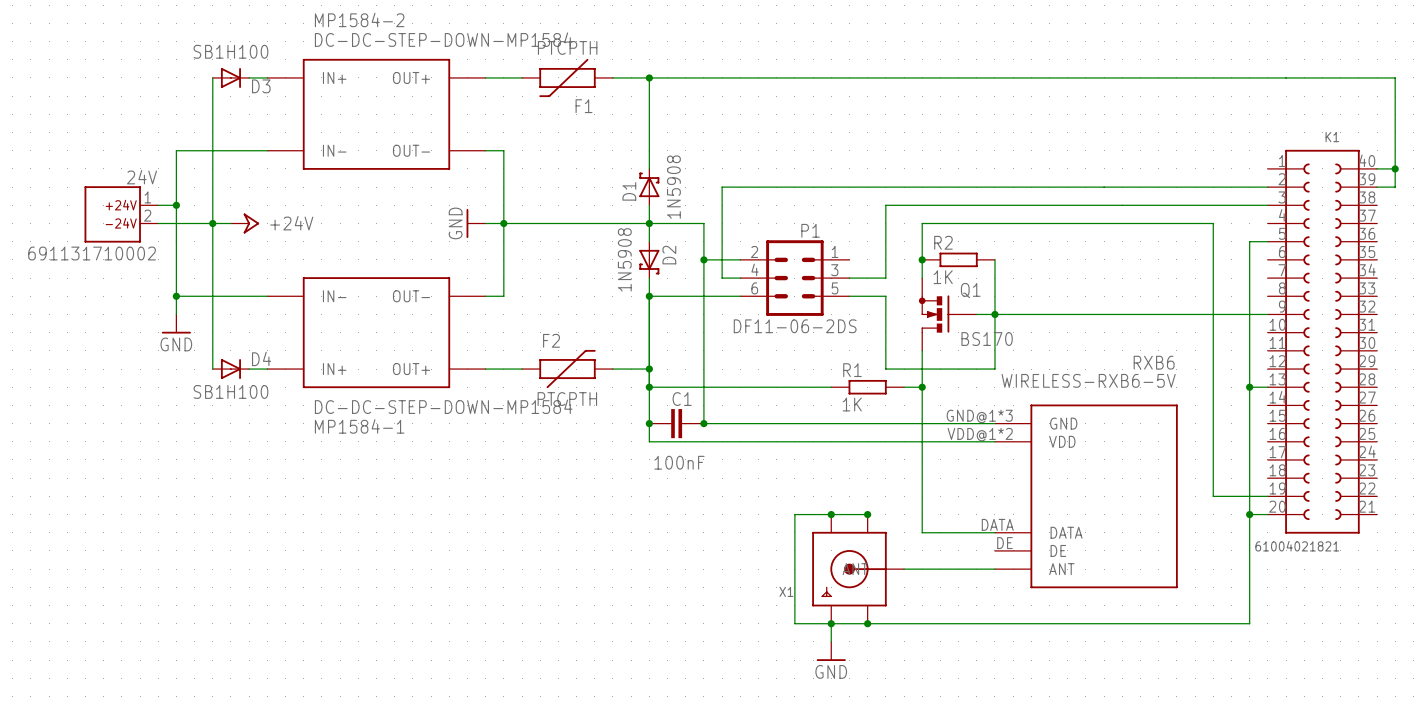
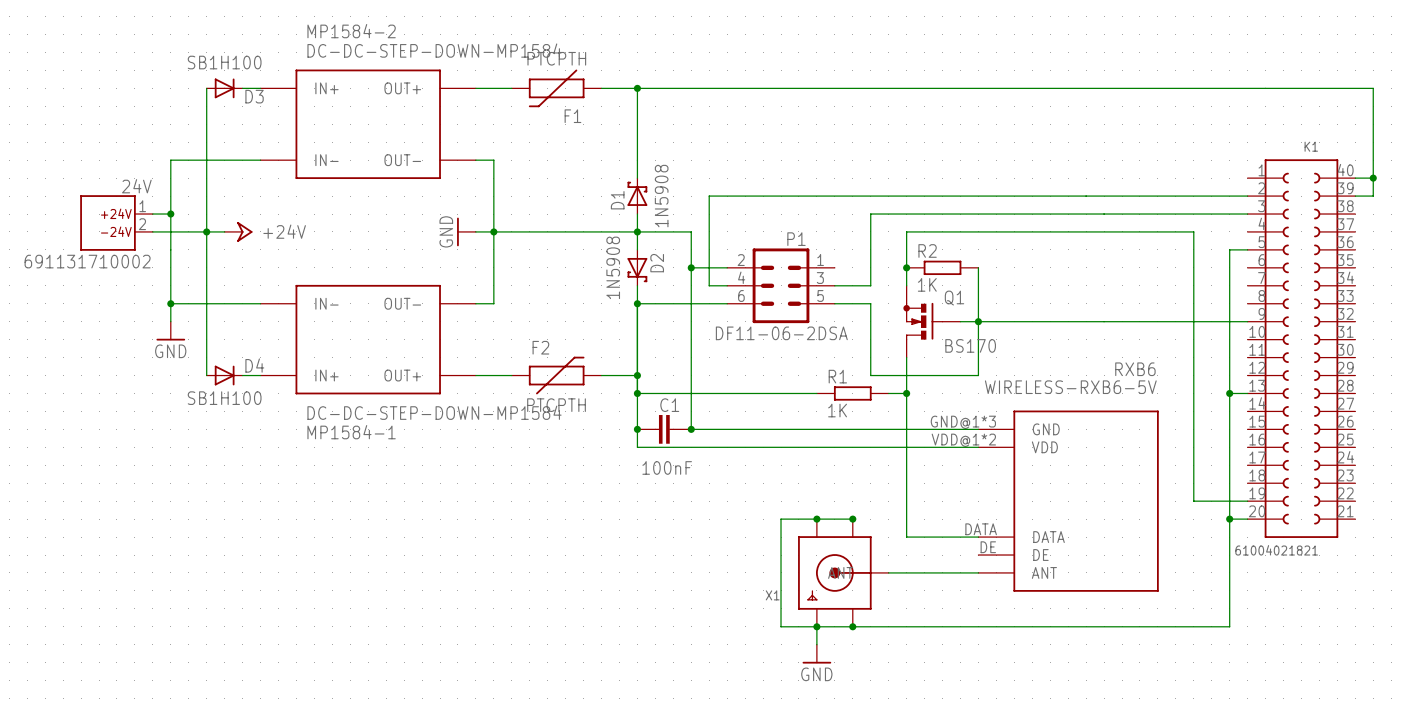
P1 value: DF11-06-2DS (795, 326) -> DF11-06-2DSA (781, 333)

